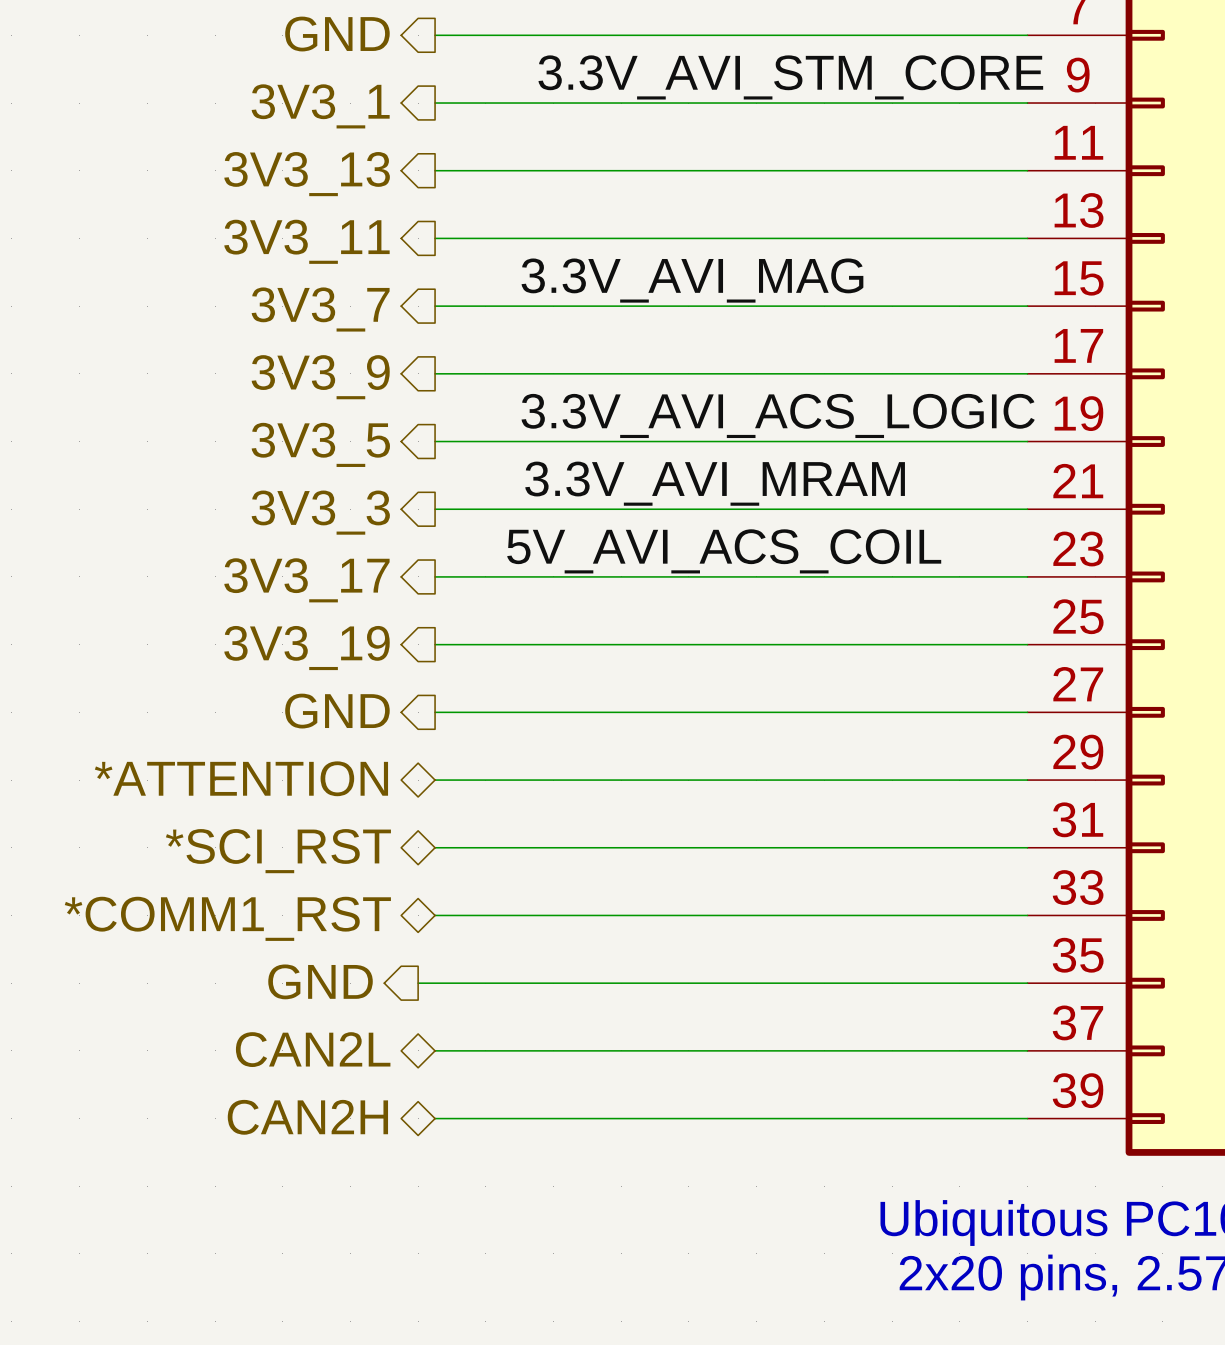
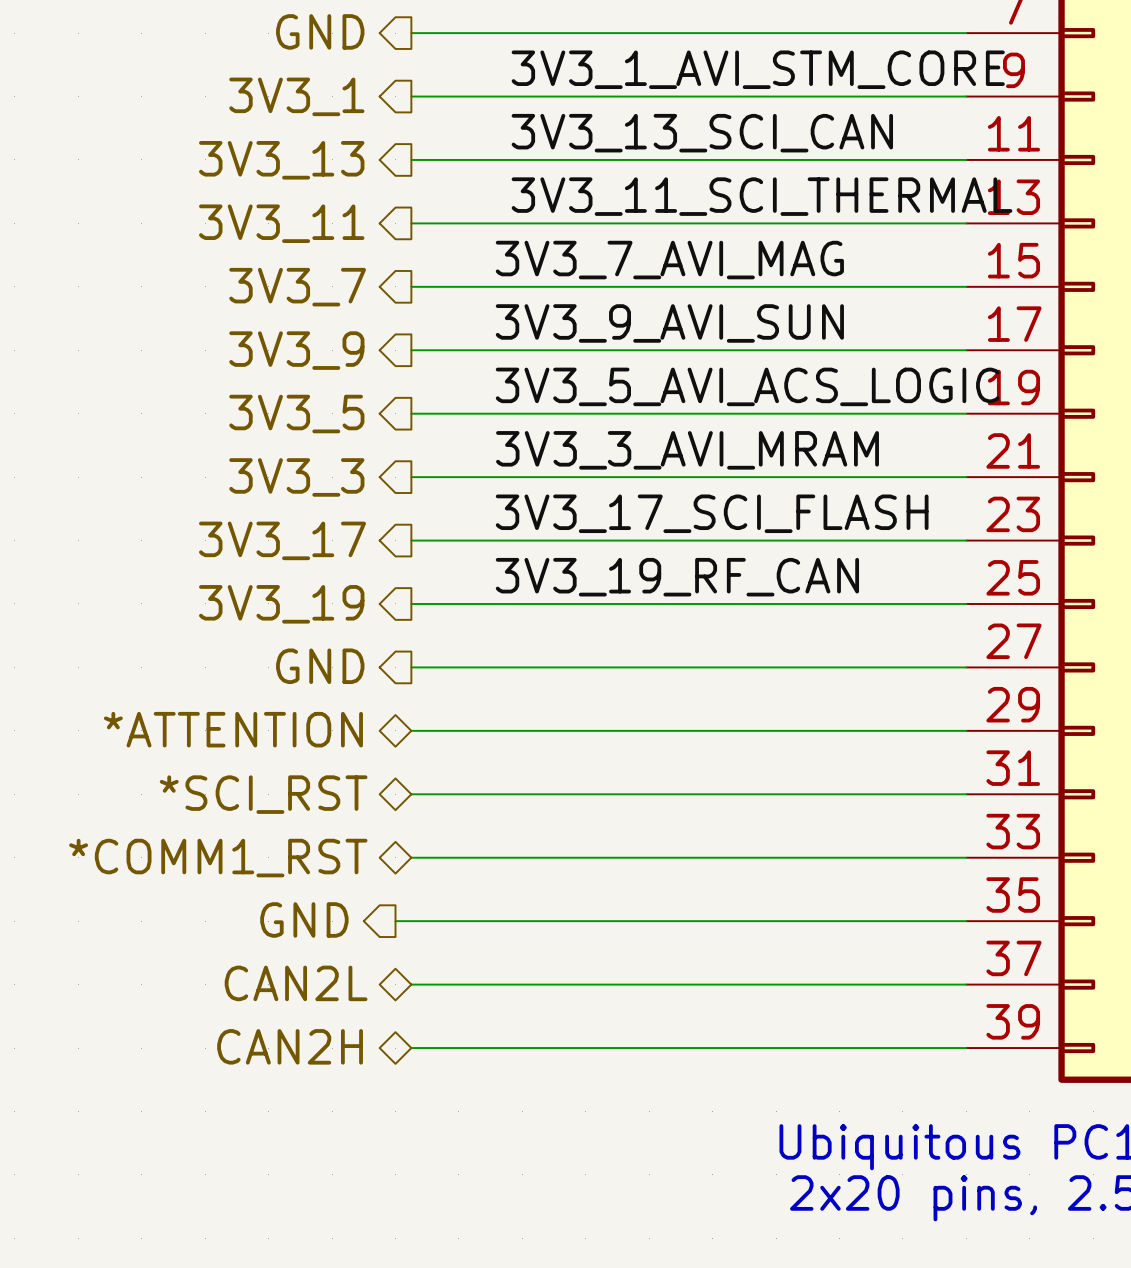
label: 3.3V_AVI_STM_CORE (790, 77) -> 3V3_1_AVI_STM_CORE (758, 69)
label: none -> 3V3_13_SCI_CAN (702, 133)
label: none -> 3V3_11_SCI_THERMAL (761, 196)
label: 3.3V_AVI_MAG (692, 280) -> 3V3_7_AVI_MAG (669, 260)
label: none -> 3V3_9_AVI_SUN (669, 323)
label: 3.3V_AVI_ACS_LOGIC (778, 415) -> 3V3_5_AVI_ACS_LOGIC (747, 386)
label: 3.3V_AVI_MRAM (715, 483) -> 3V3_3_AVI_MRAM (687, 450)
label: 5V_AVI_ACS_COIL (724, 551) -> none
label: none -> 3V3_17_SCI_FLASH (712, 513)
label: none -> 3V3_19_RF_CAN (677, 577)

